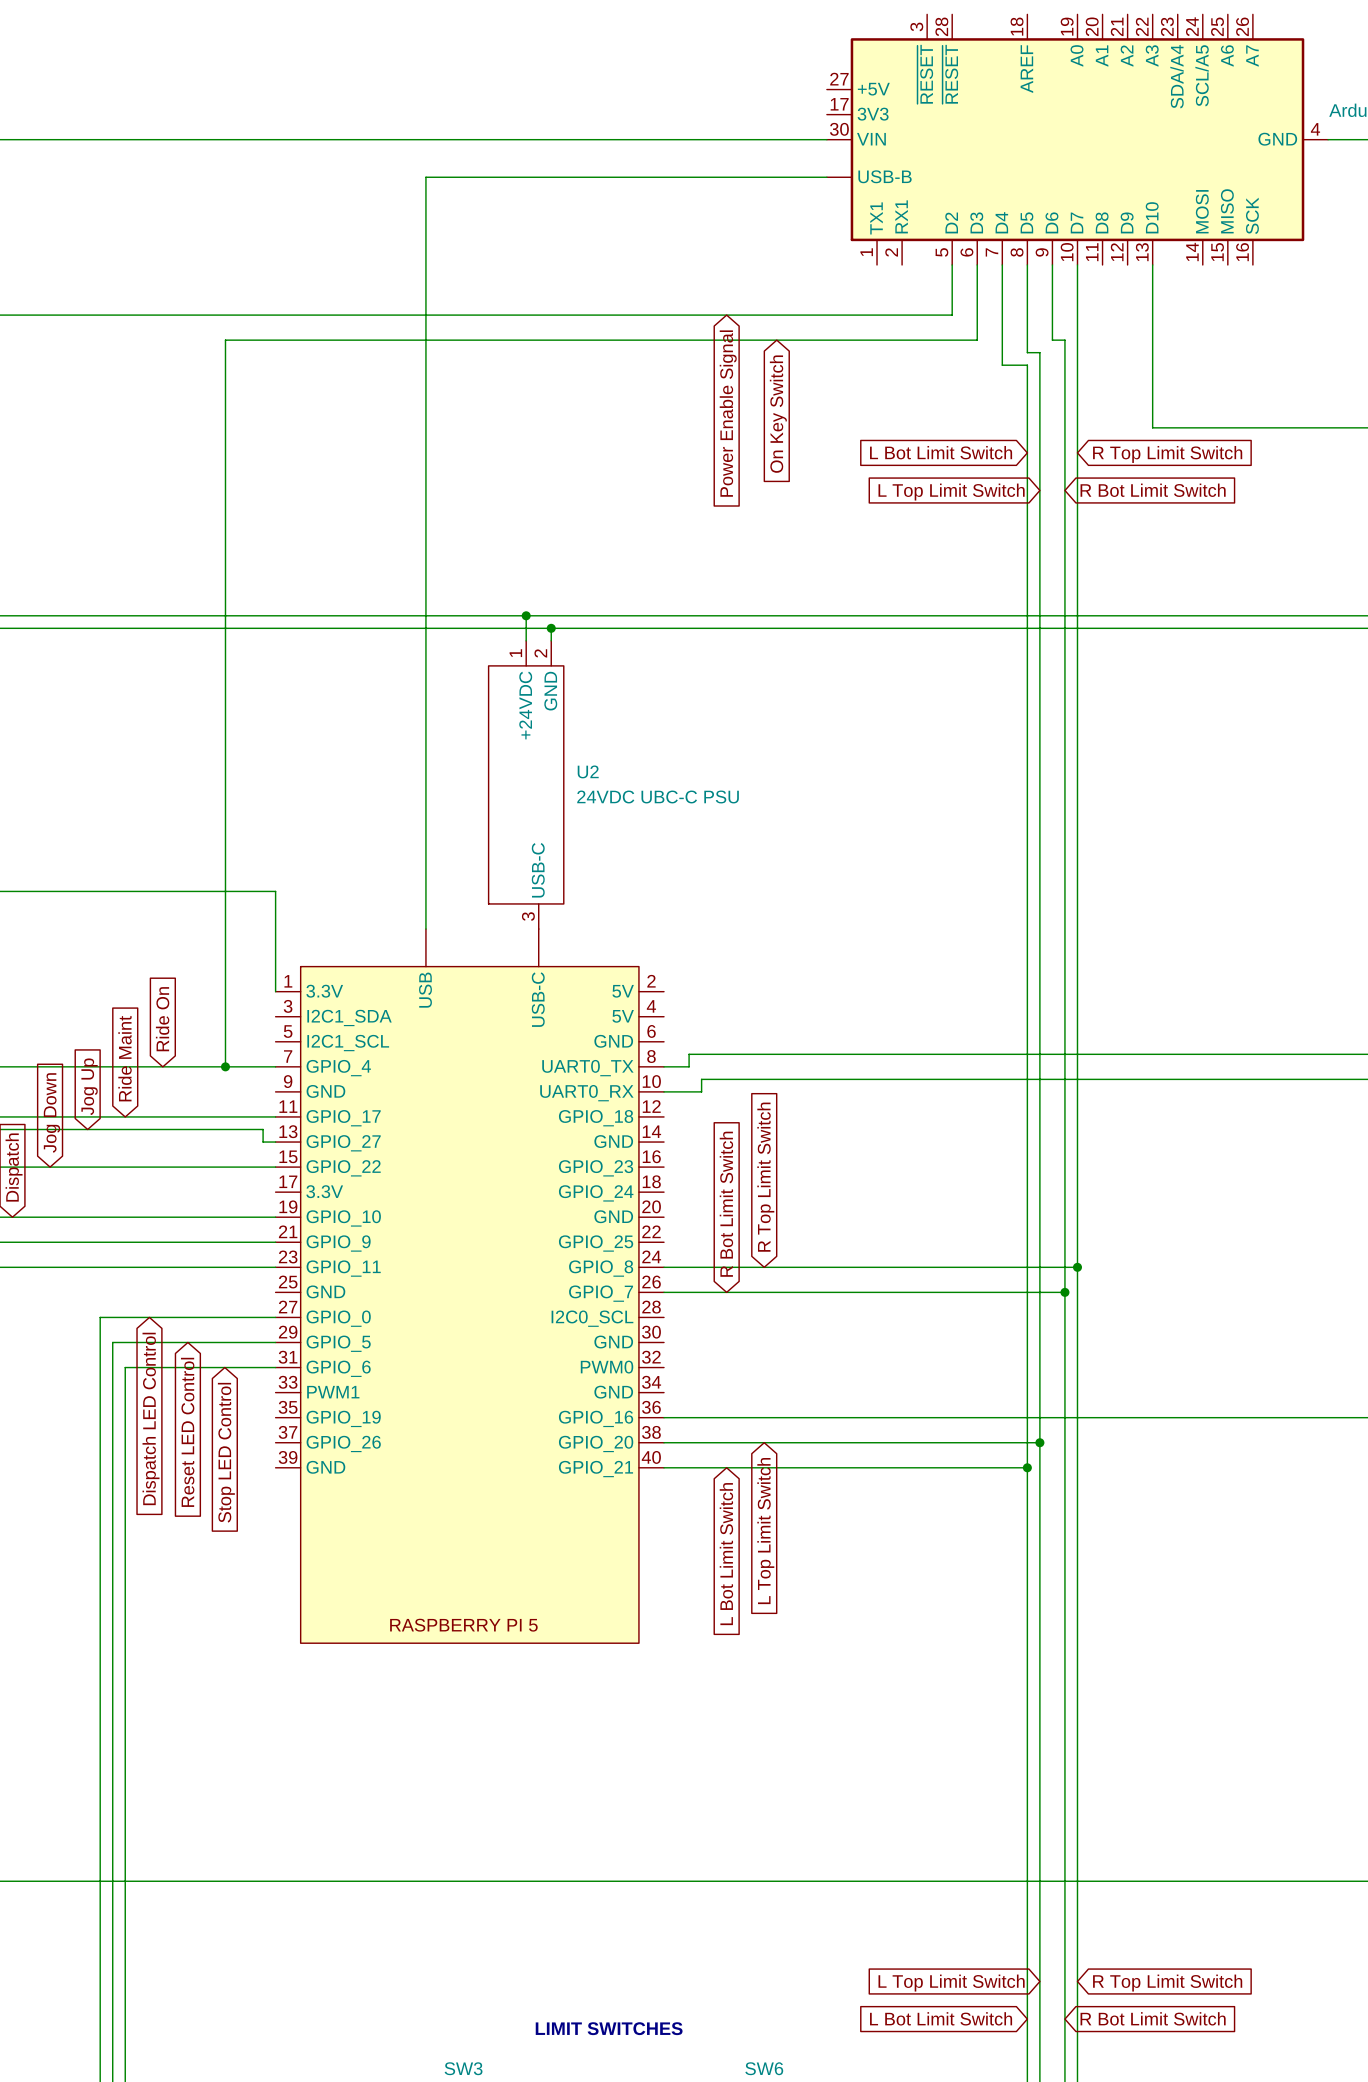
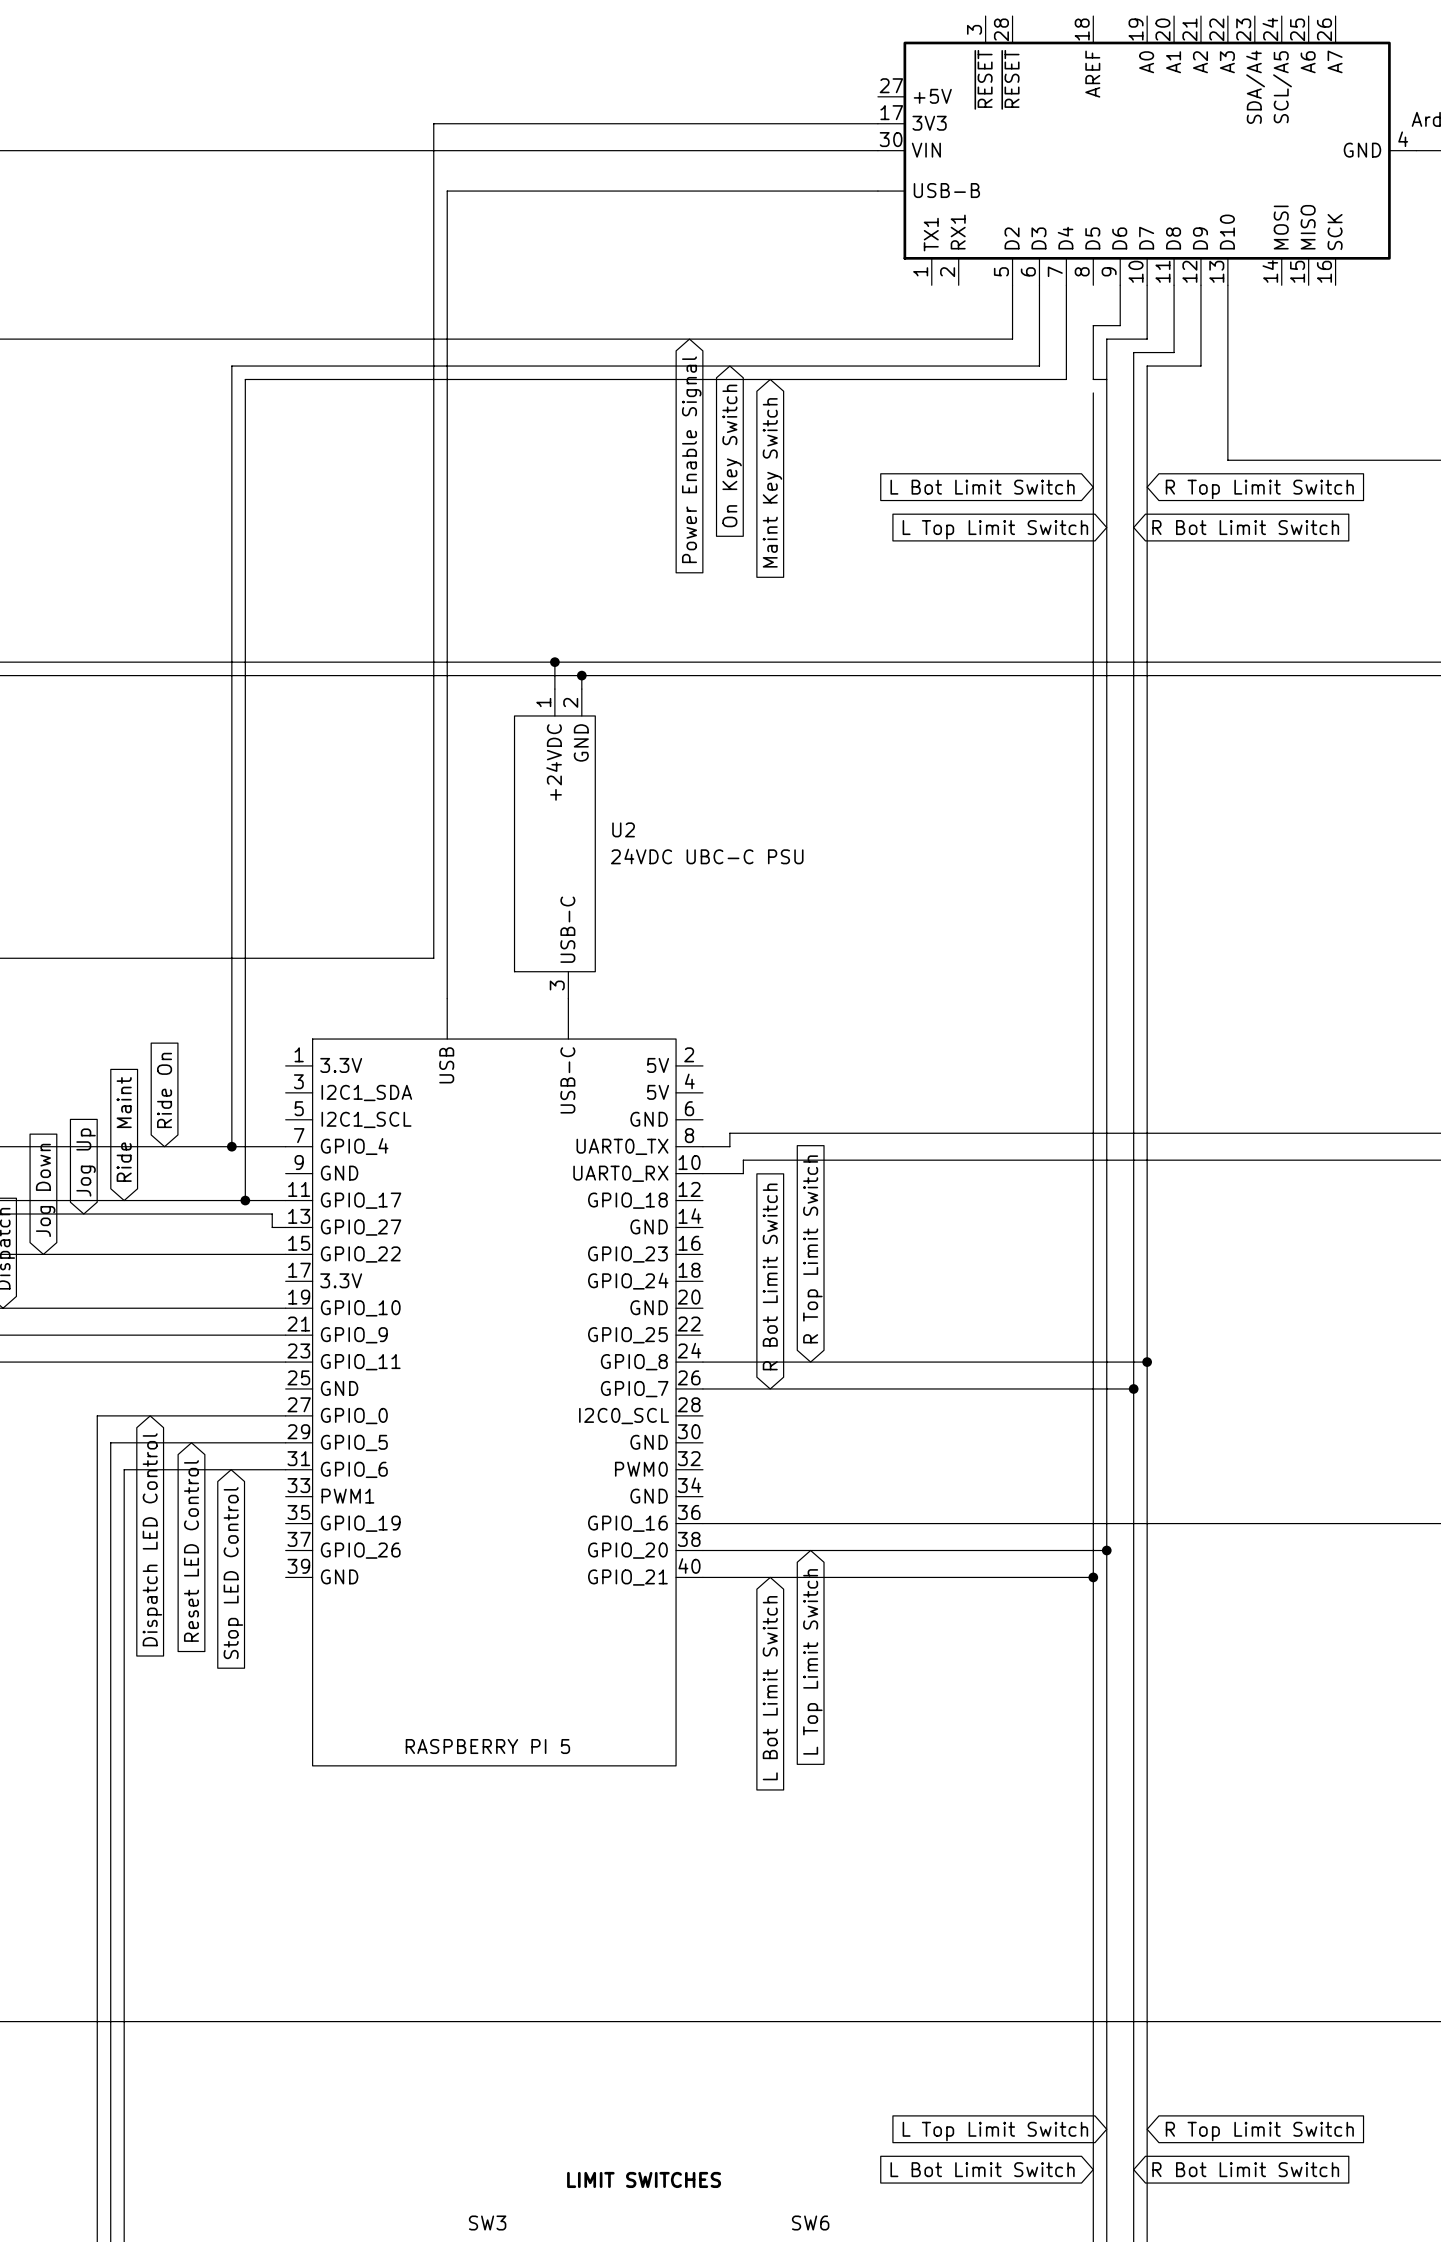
wire: (1027, 264) (1027, 302) -> (1120, 325) (1093, 325)
wire: none -> (1200, 285) (1200, 366) (1147, 366)
wire: (1052, 302) (1052, 340) (1064, 340) -> (1174, 285) (1174, 352) (1133, 352) (1133, 366)
wire: (1077, 315) (1077, 340) -> (1147, 339) (1106, 339) (1106, 379)
wire: (1002, 352) (1002, 365) (1027, 365) -> (1066, 379) (245, 379) (245, 1200)
global label position: Power Enable Signal (728, 413) -> Power Enable Signal (691, 459)
global label position: On Key Switch (778, 414) -> On Key Switch (732, 455)
global label: none -> Maint Key Switch (772, 482)
wire: (275, 891) (275, 991) -> (285, 958) (433, 958) (433, 123) (877, 123)
junction: none -> (245, 1200)

